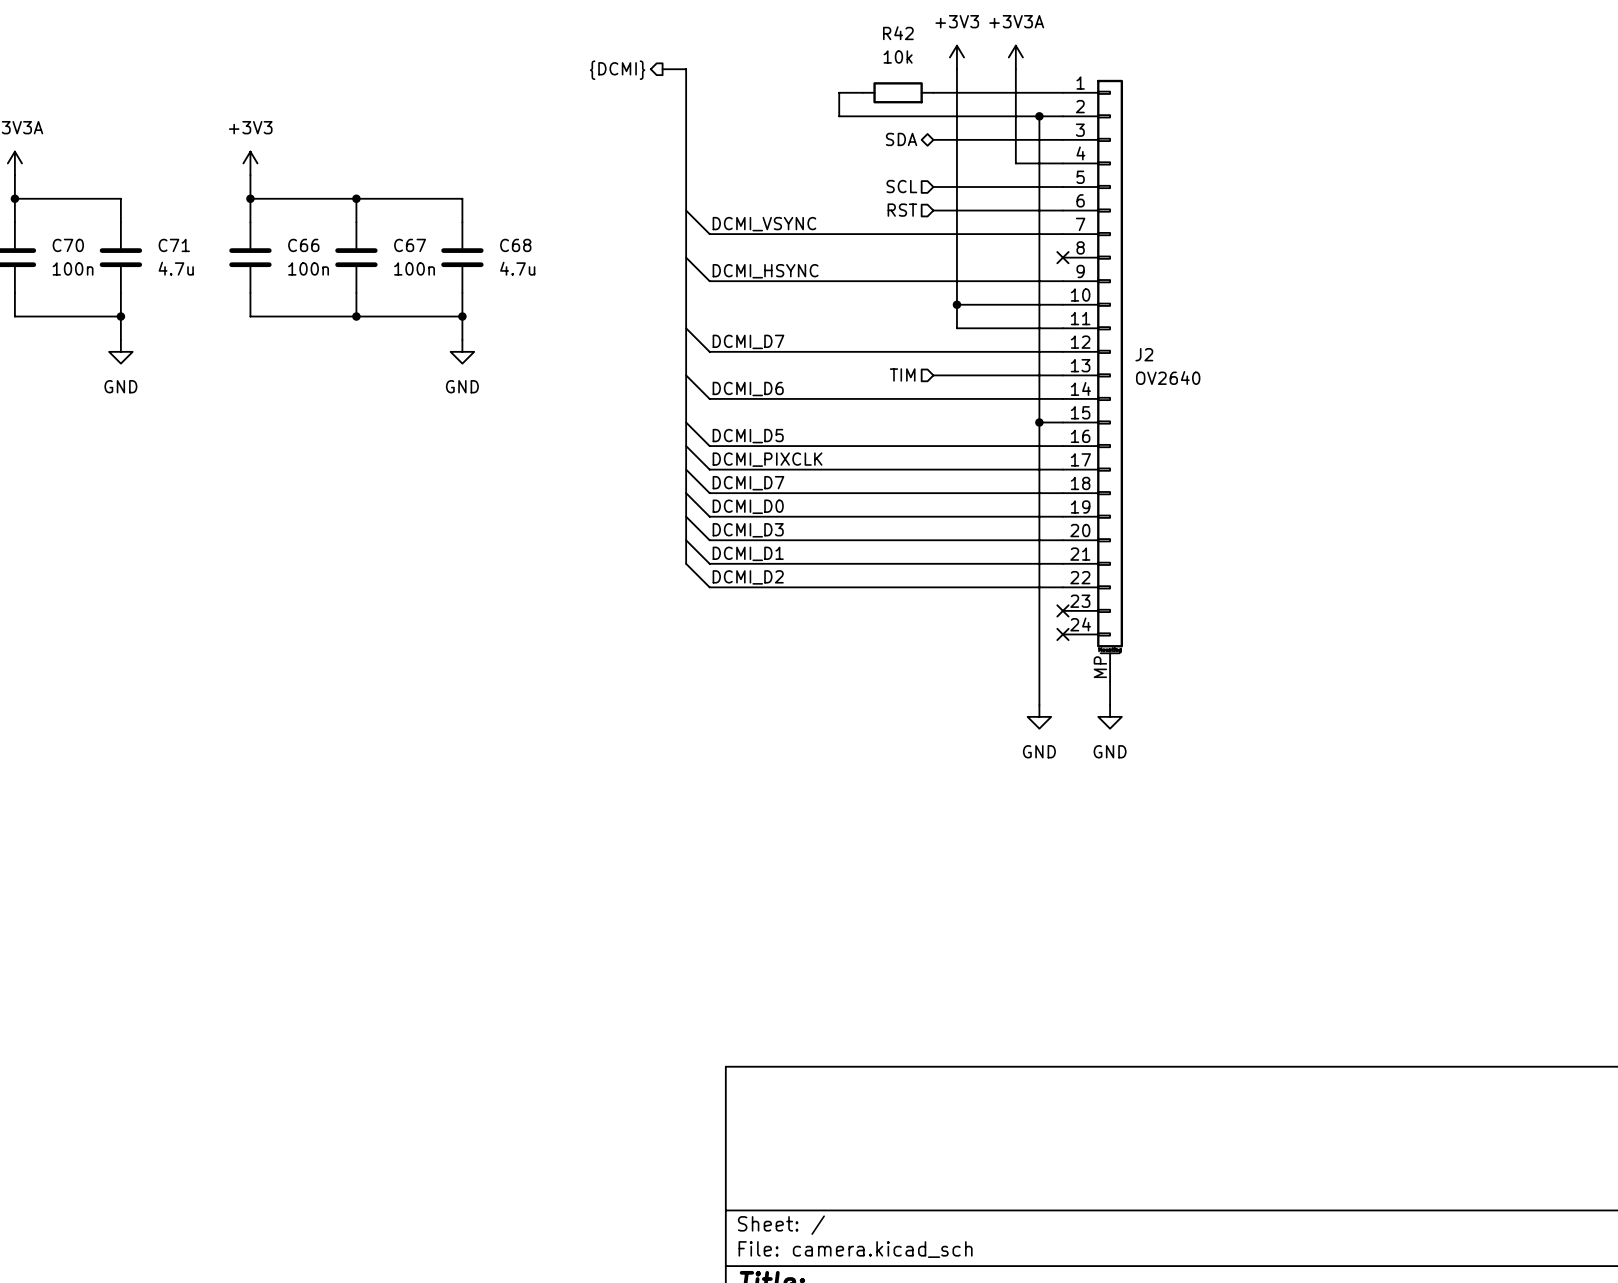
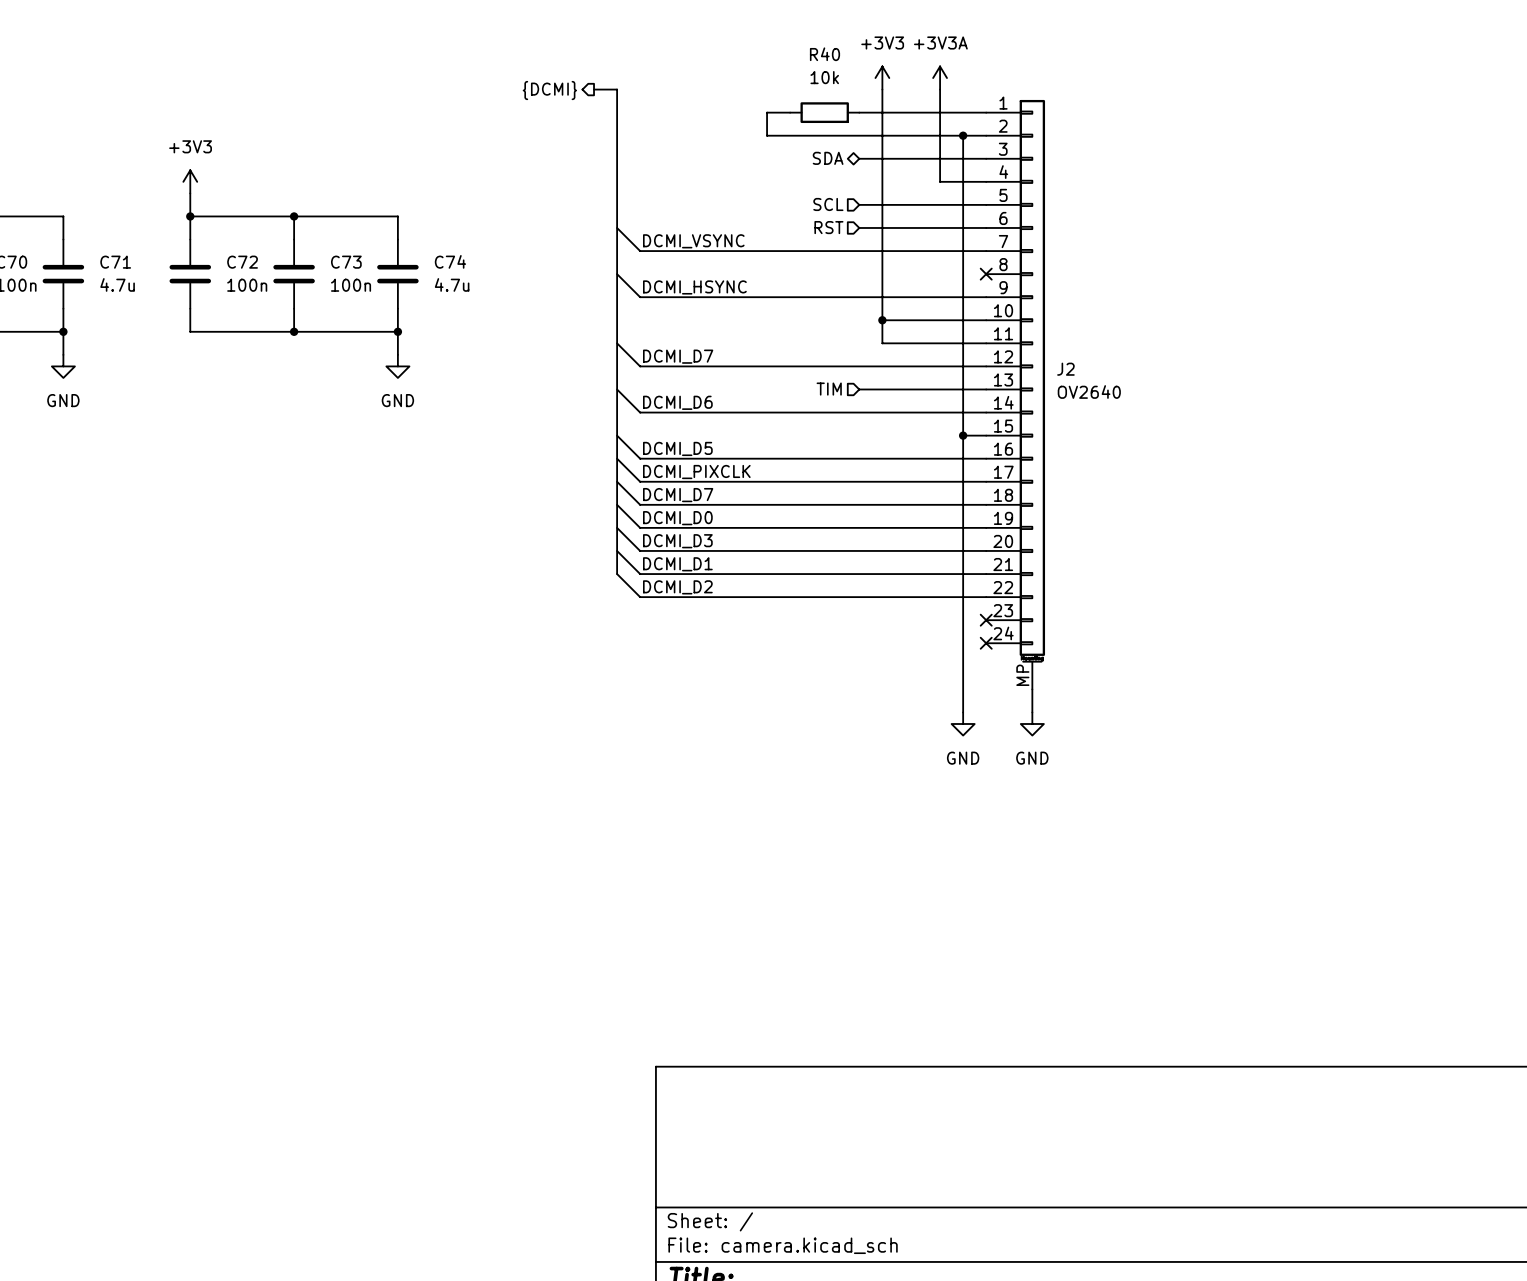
R42 name: R42 (898, 33) -> R40 (824, 54)
C66 name: C66 (303, 245) -> C72 (242, 262)
C67 name: C67 (410, 245) -> C73 (346, 262)
C68 name: C68 (515, 245) -> C74 (450, 261)

